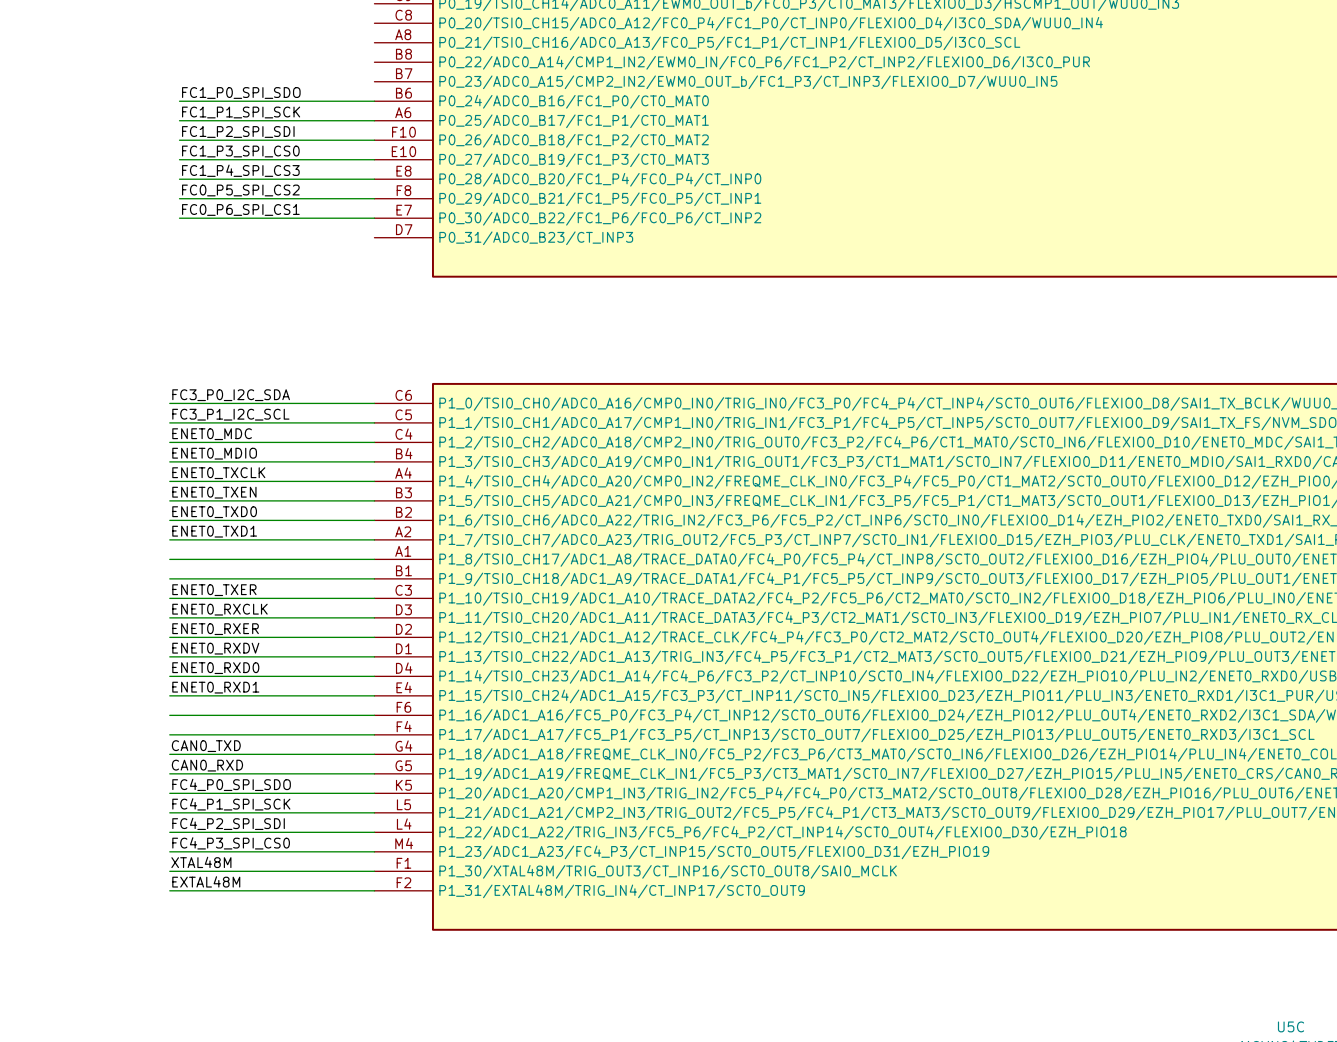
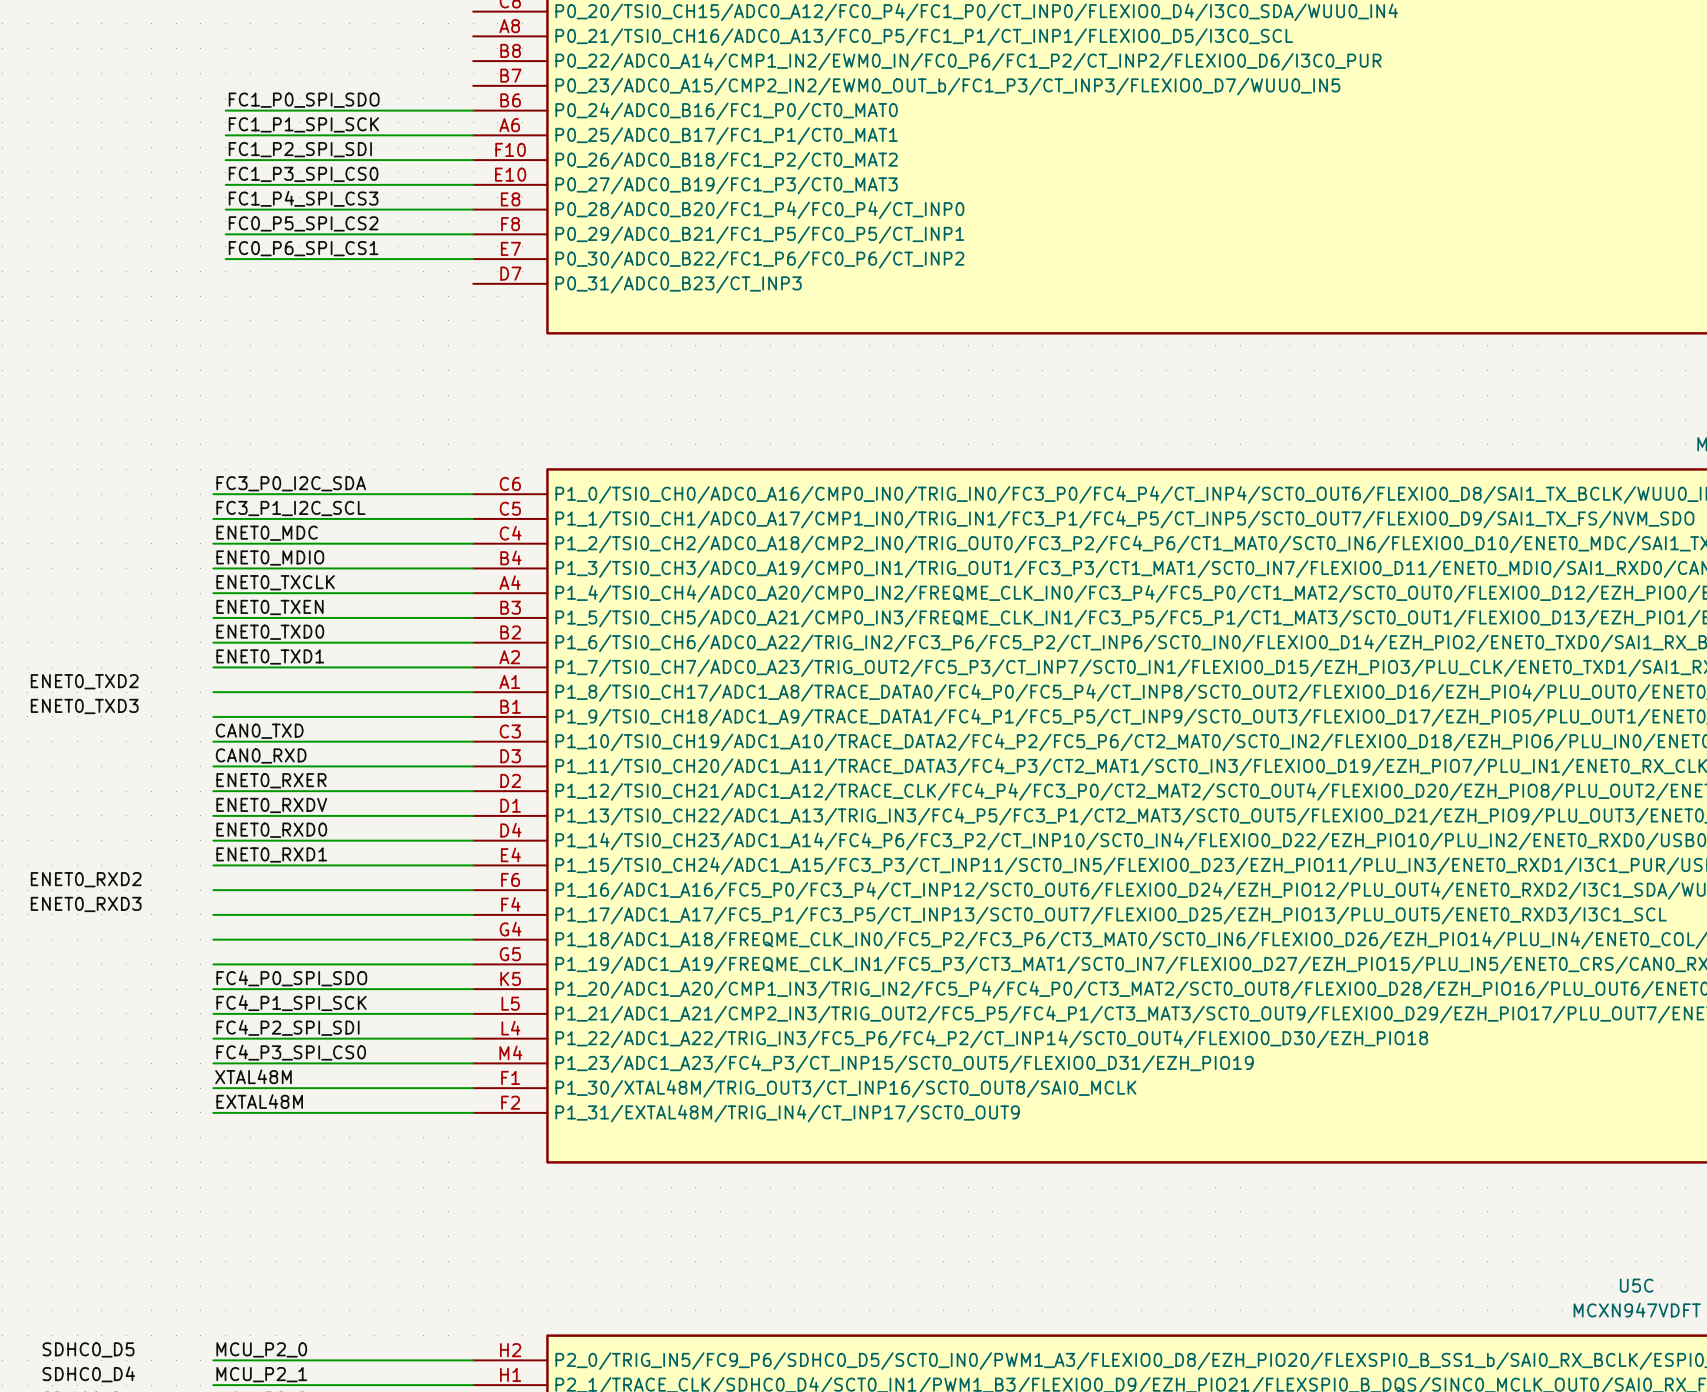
label: none -> ENET0_TXD2 (84, 681)
label: none -> ENET0_TXD3 (84, 706)
label: ENET0_TXER (214, 590) -> CAN0_TXD (259, 731)
label: ENET0_RXCLK (219, 609) -> CAN0_RXD (261, 755)
label: none -> ENET0_RXD2 (86, 879)
label: none -> ENET0_RXD3 (86, 904)
label: CAN0_TXD (206, 746) -> none
label: CAN0_RXD (207, 765) -> none

